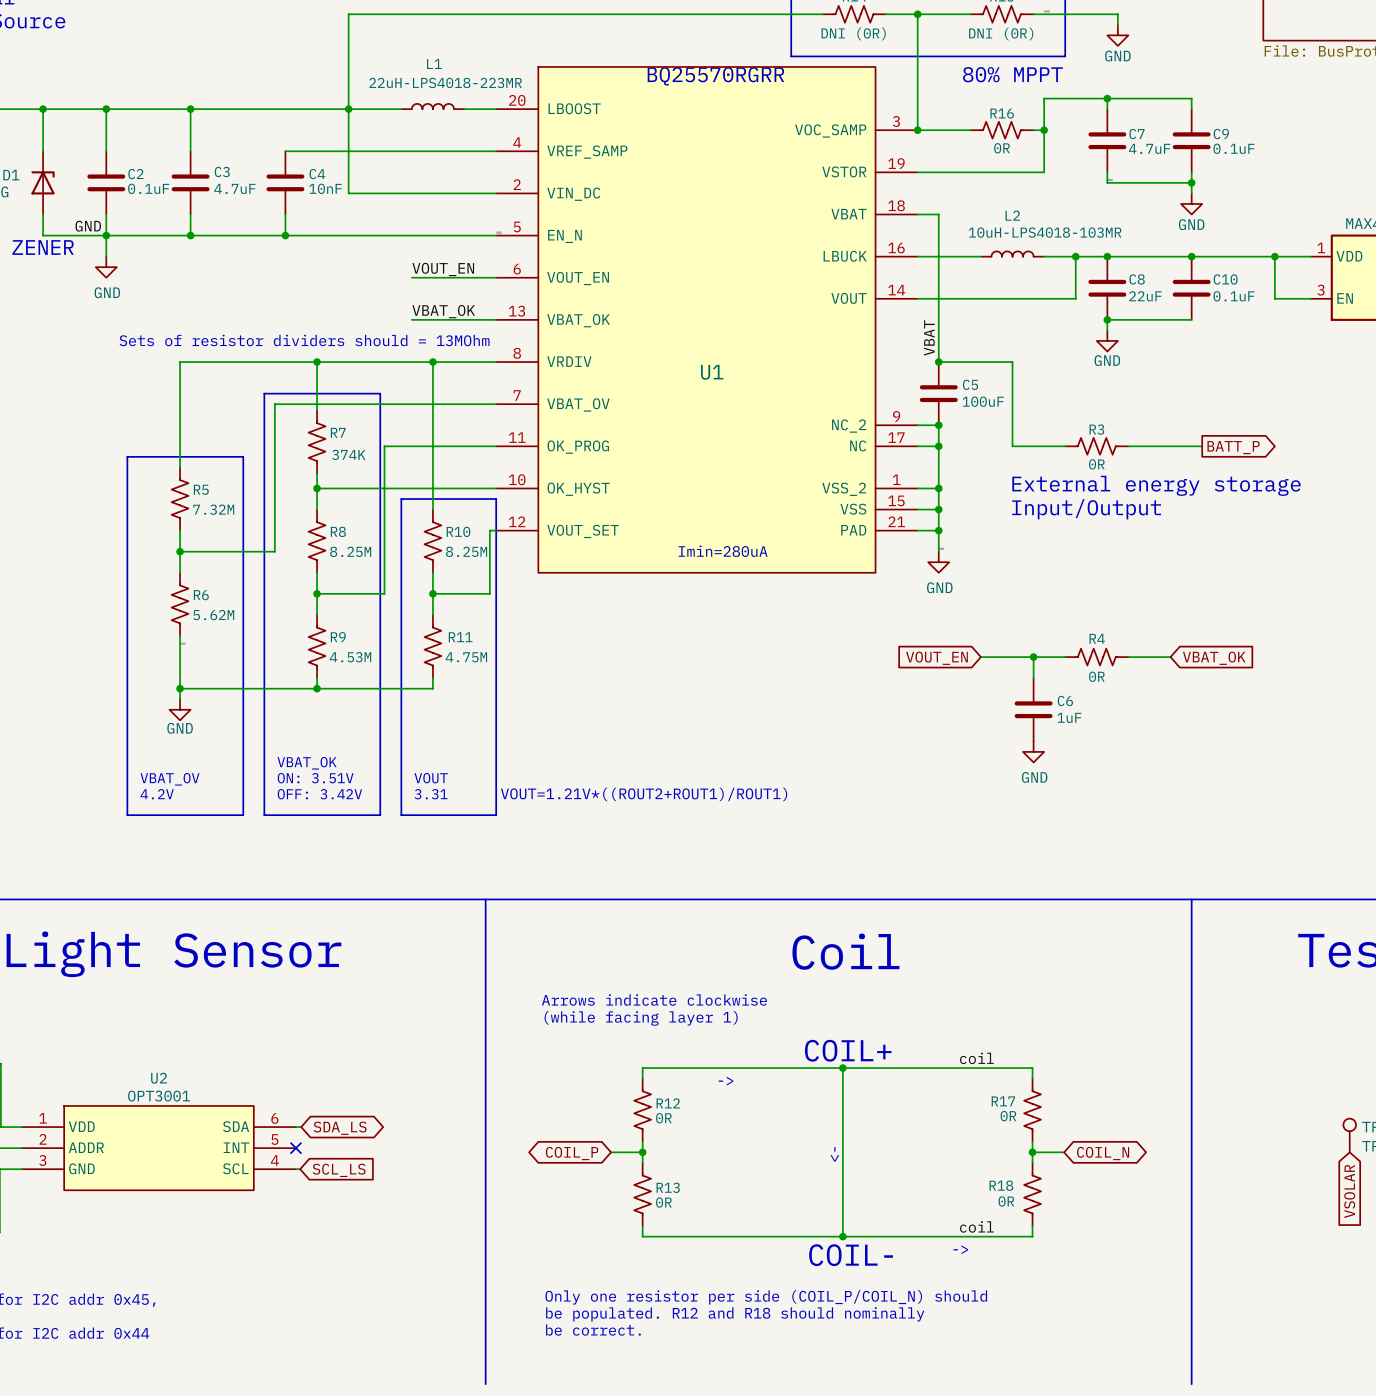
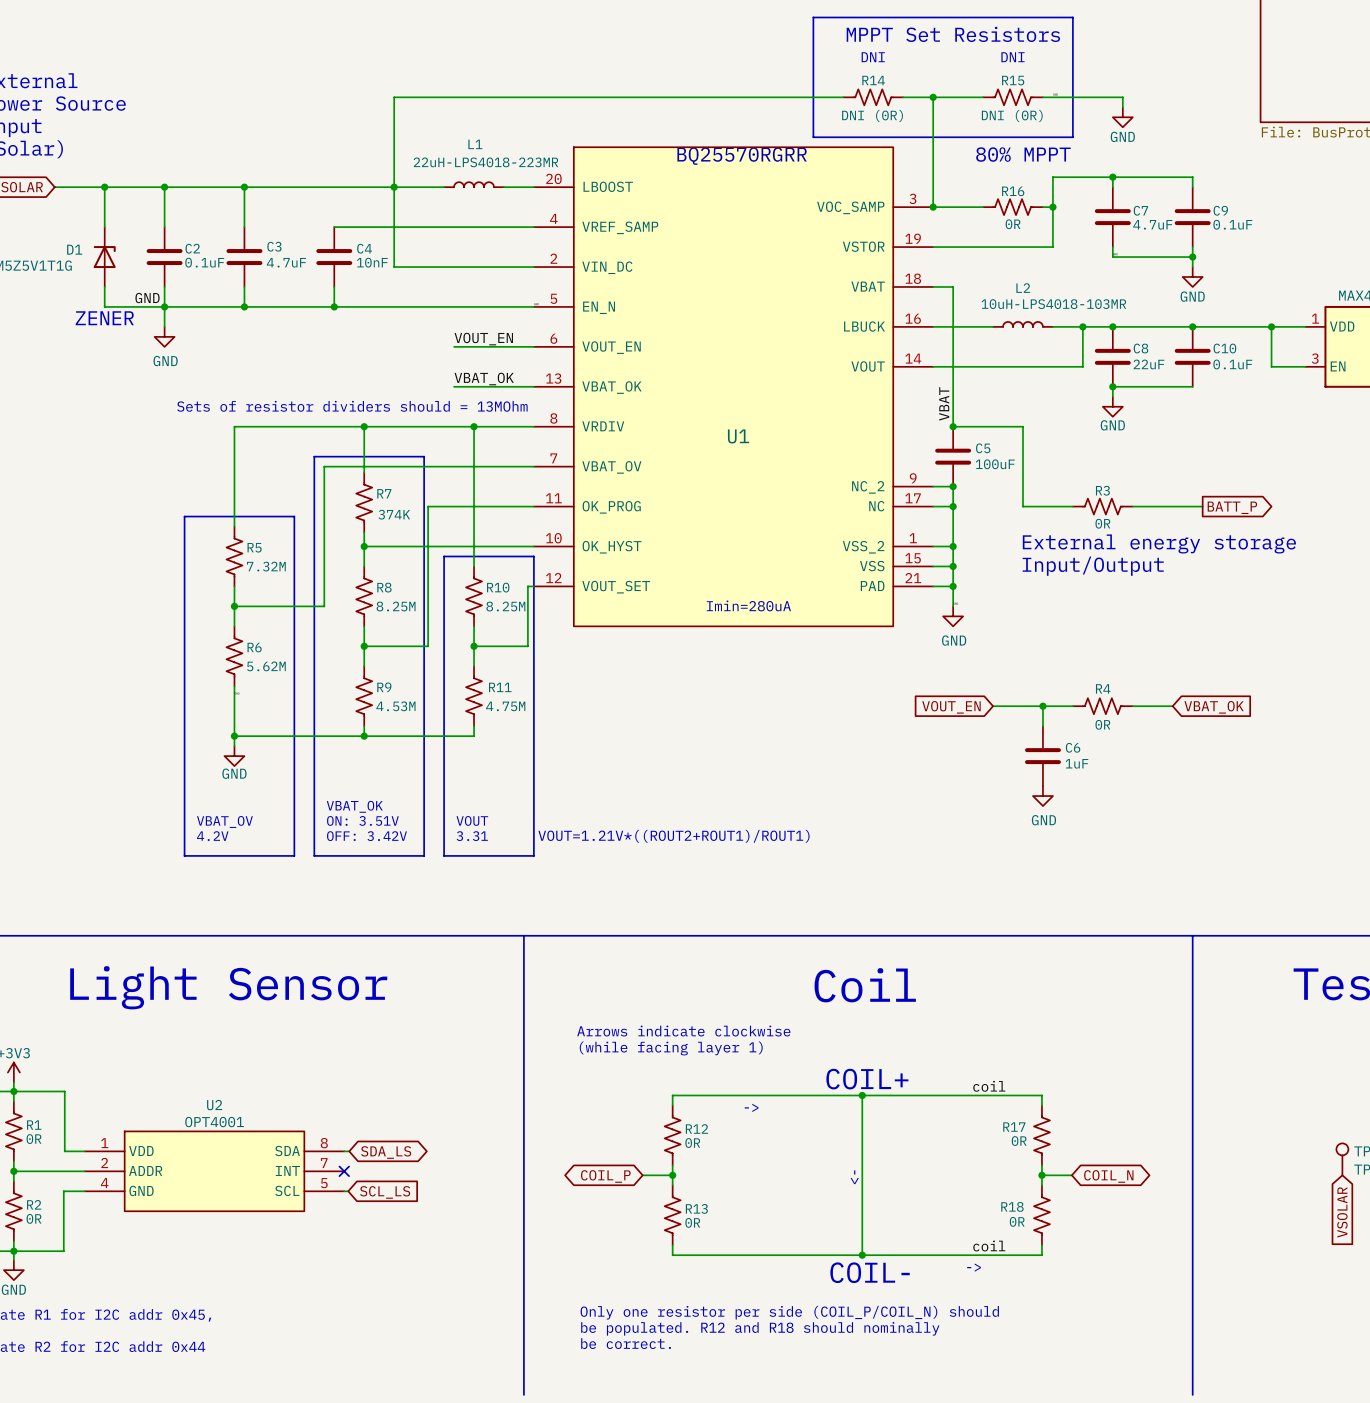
U2 value: OPT3001 (159, 1096) -> OPT4001 (214, 1122)
U2 pin number: 6 (274, 1118) -> 8 (324, 1143)
U2 pin number: 5 (274, 1139) -> 7 (324, 1163)
U2 pin number: 3 (42, 1160) -> 4 (104, 1183)
U2 pin number: 4 (274, 1160) -> 5 (324, 1183)

